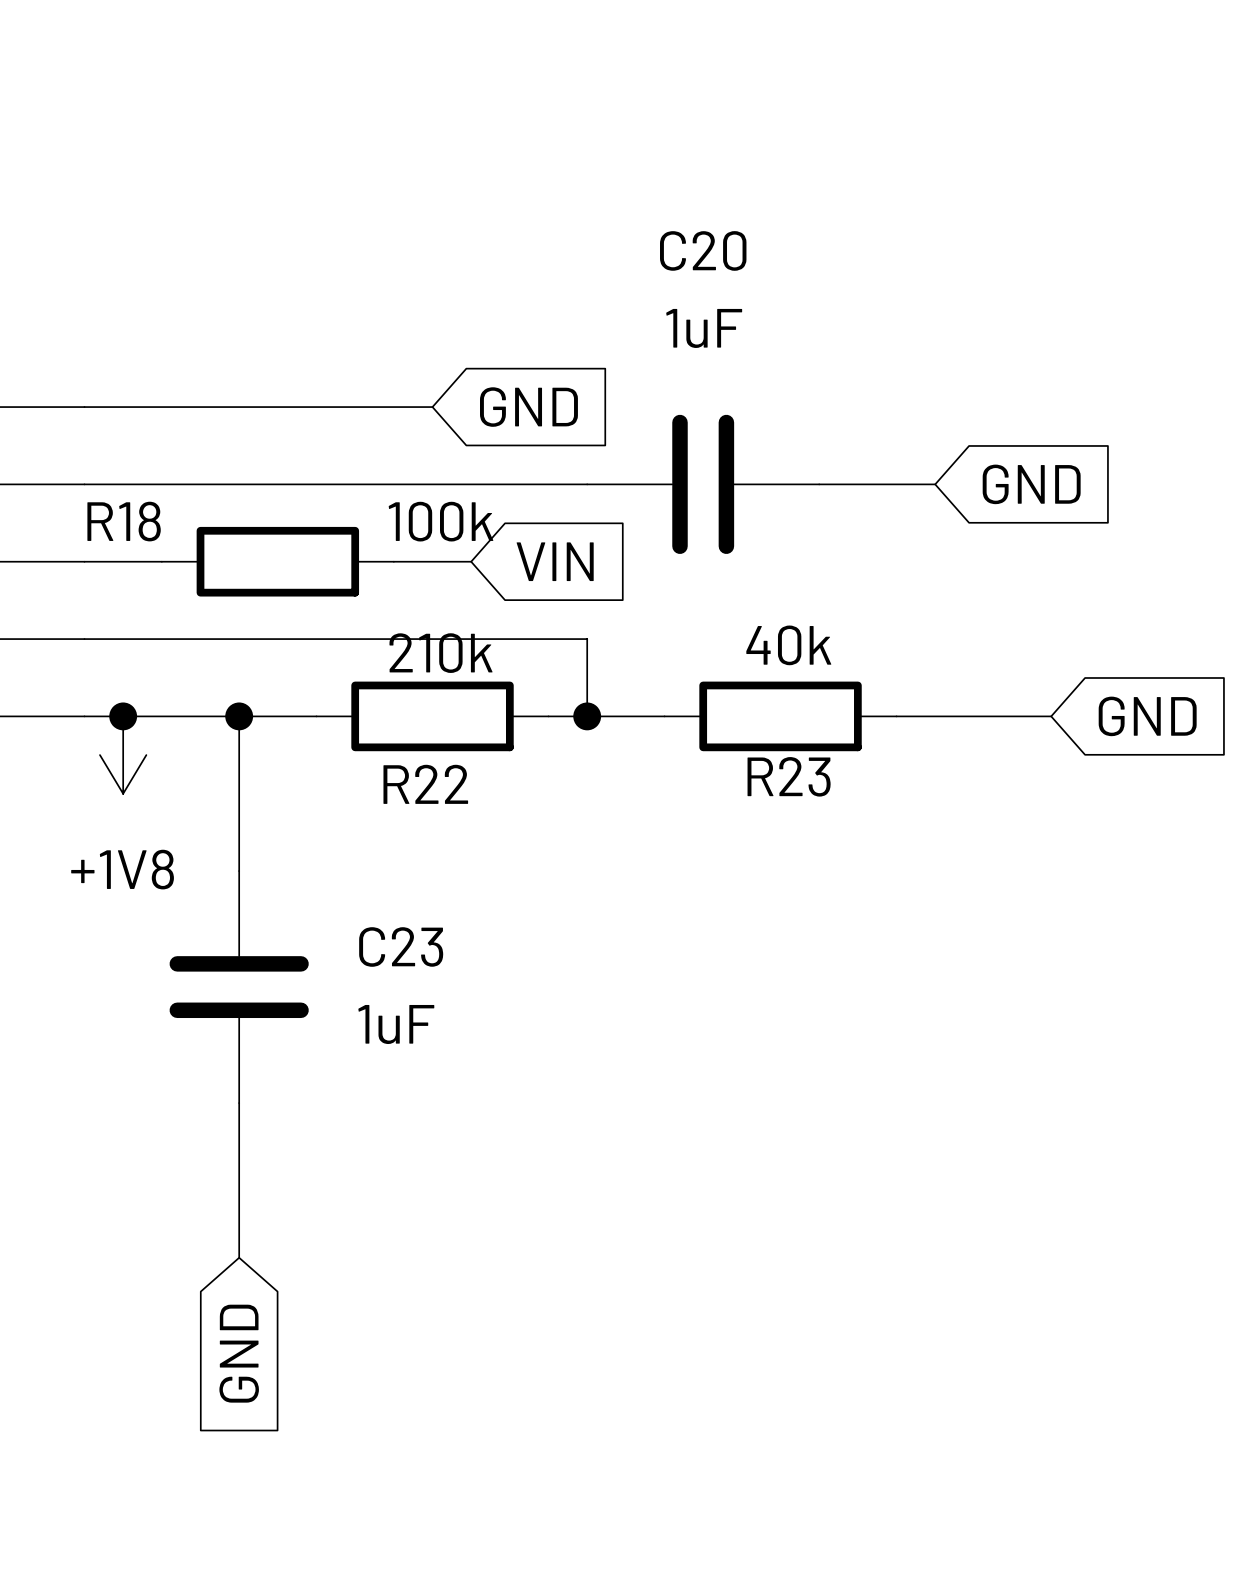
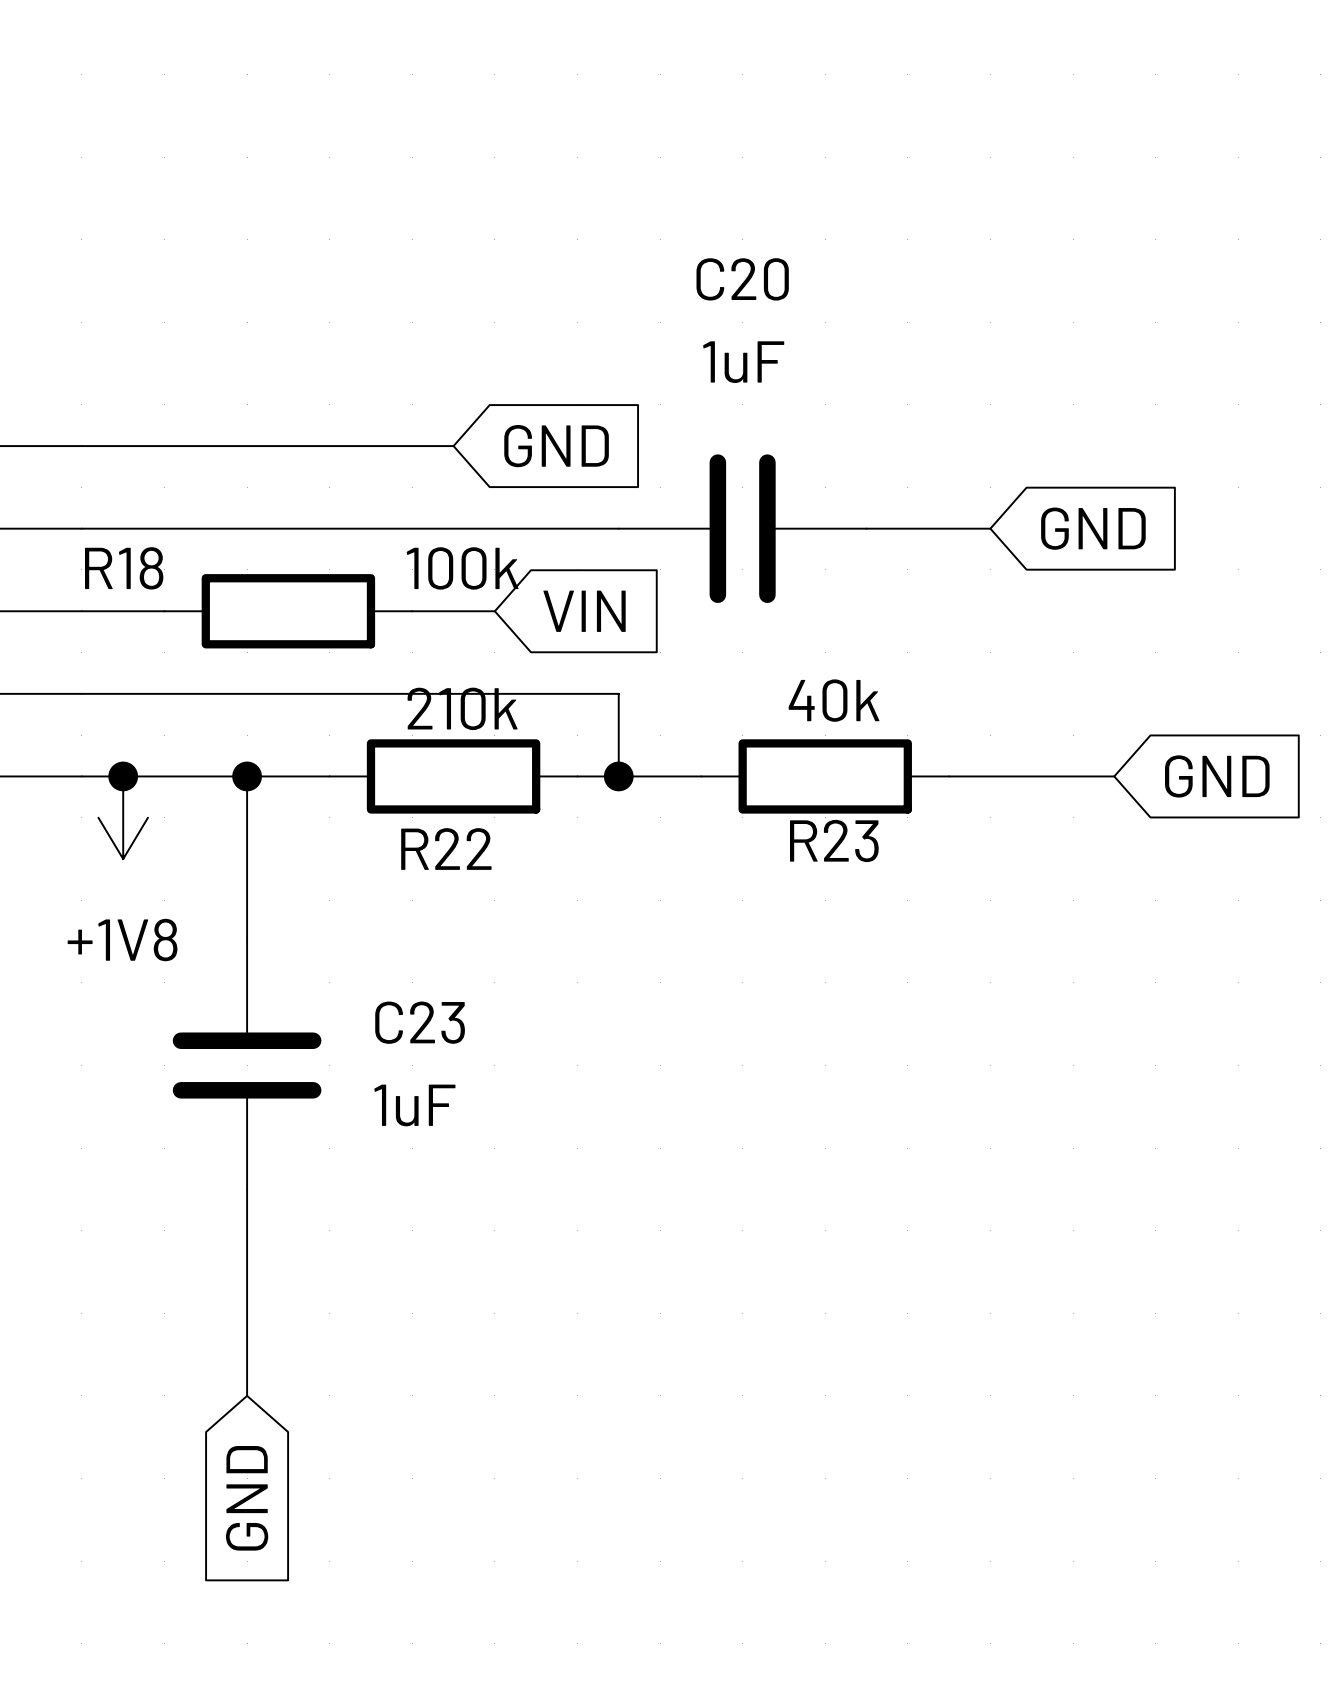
wire: none -> (247, 1354) (247, 1395)
global label position: GND (239, 1353) -> GND (247, 1498)

